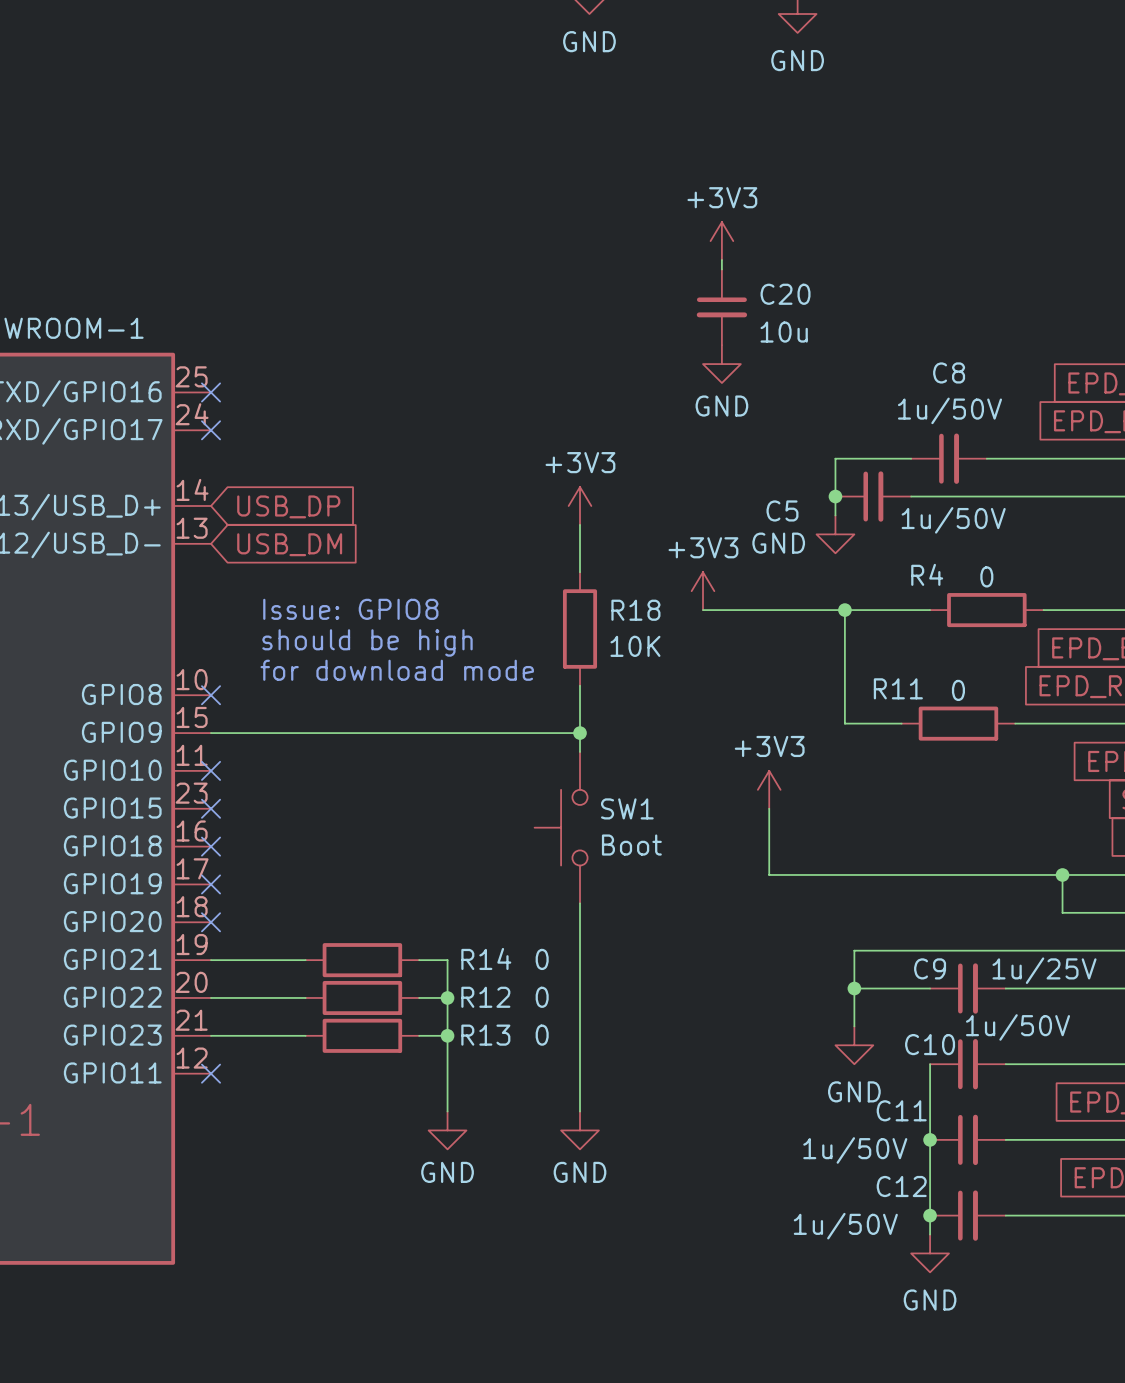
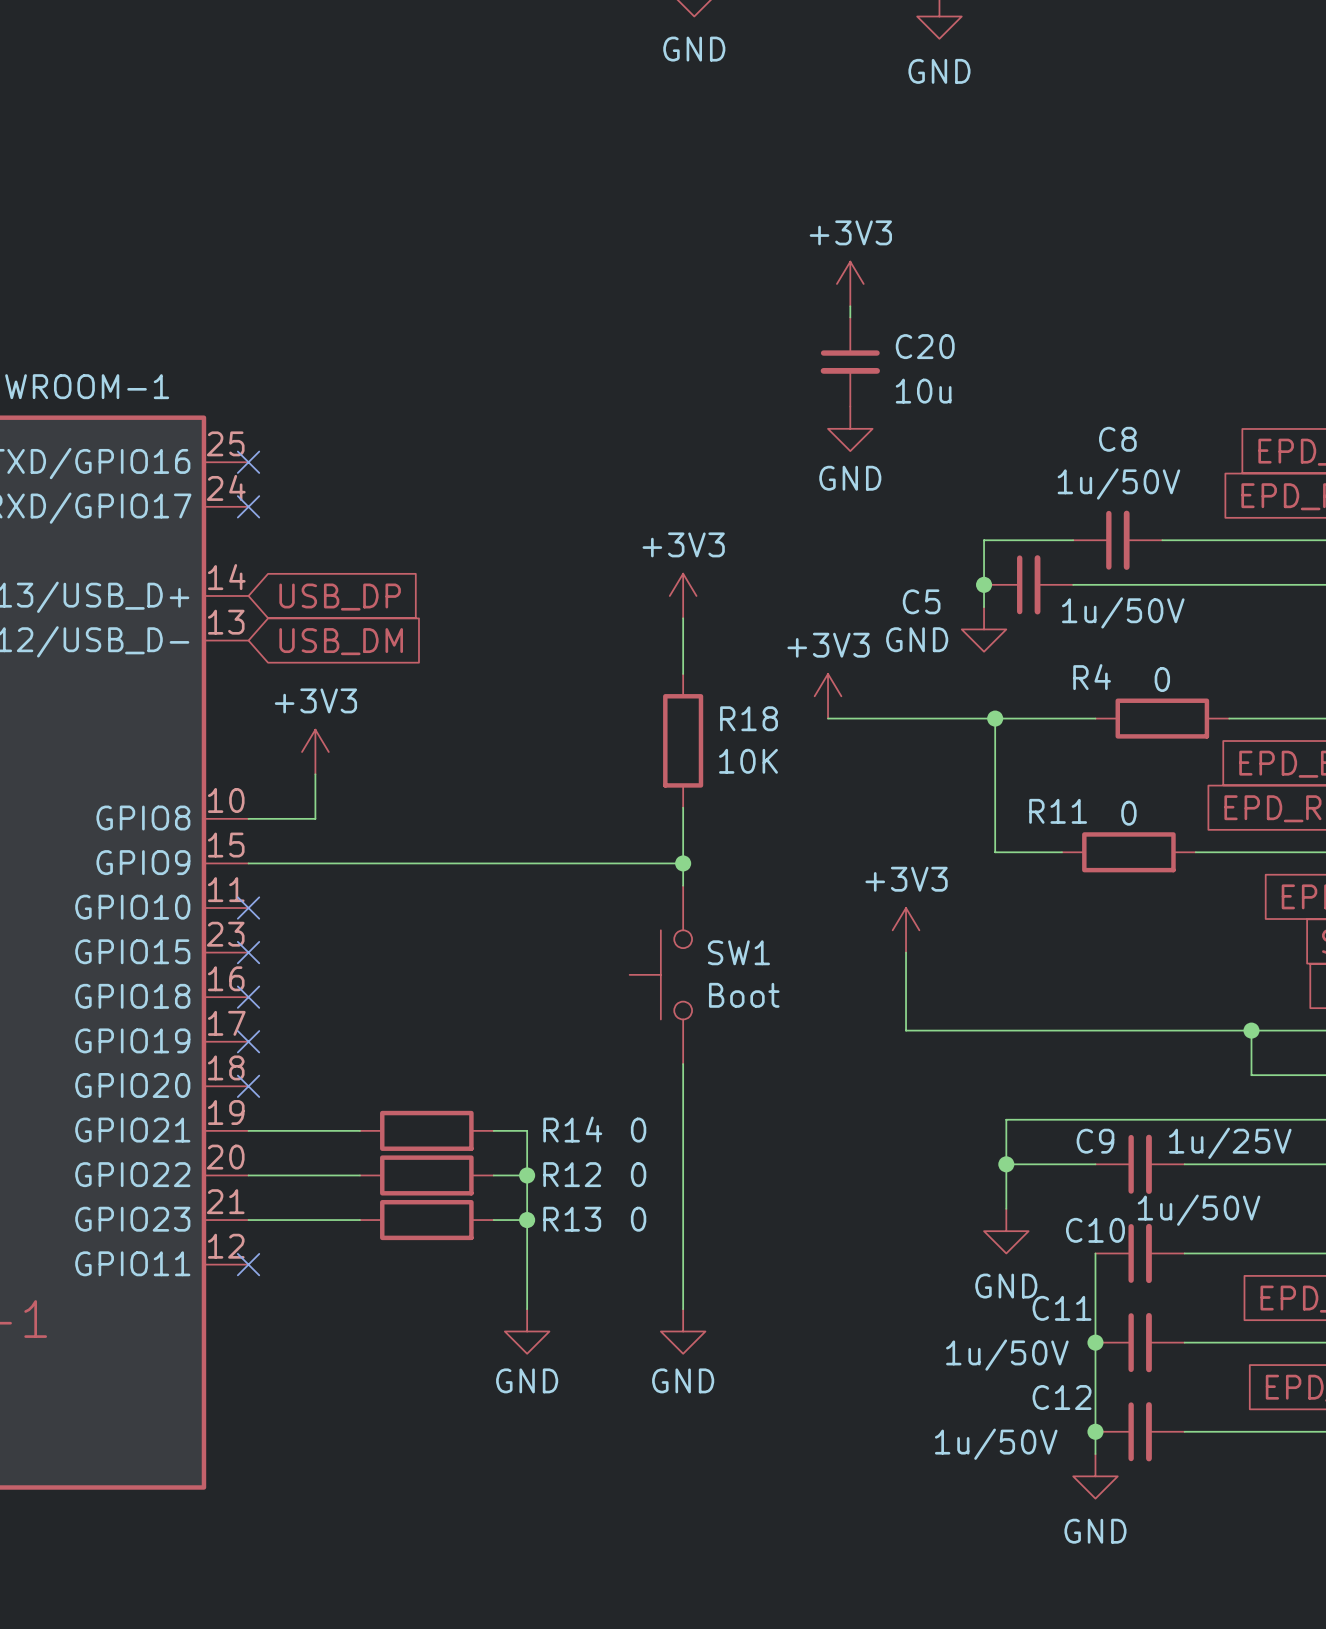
text: Issue: GPIO8 (350, 609) -> none
power symbol: none -> +3V3 (315, 752)
text: should be high (367, 642) -> none
wire: none -> (315, 774) (315, 818) (248, 818)
text: for download mode (397, 670) -> none
no-connect mark: (211, 695) -> none

